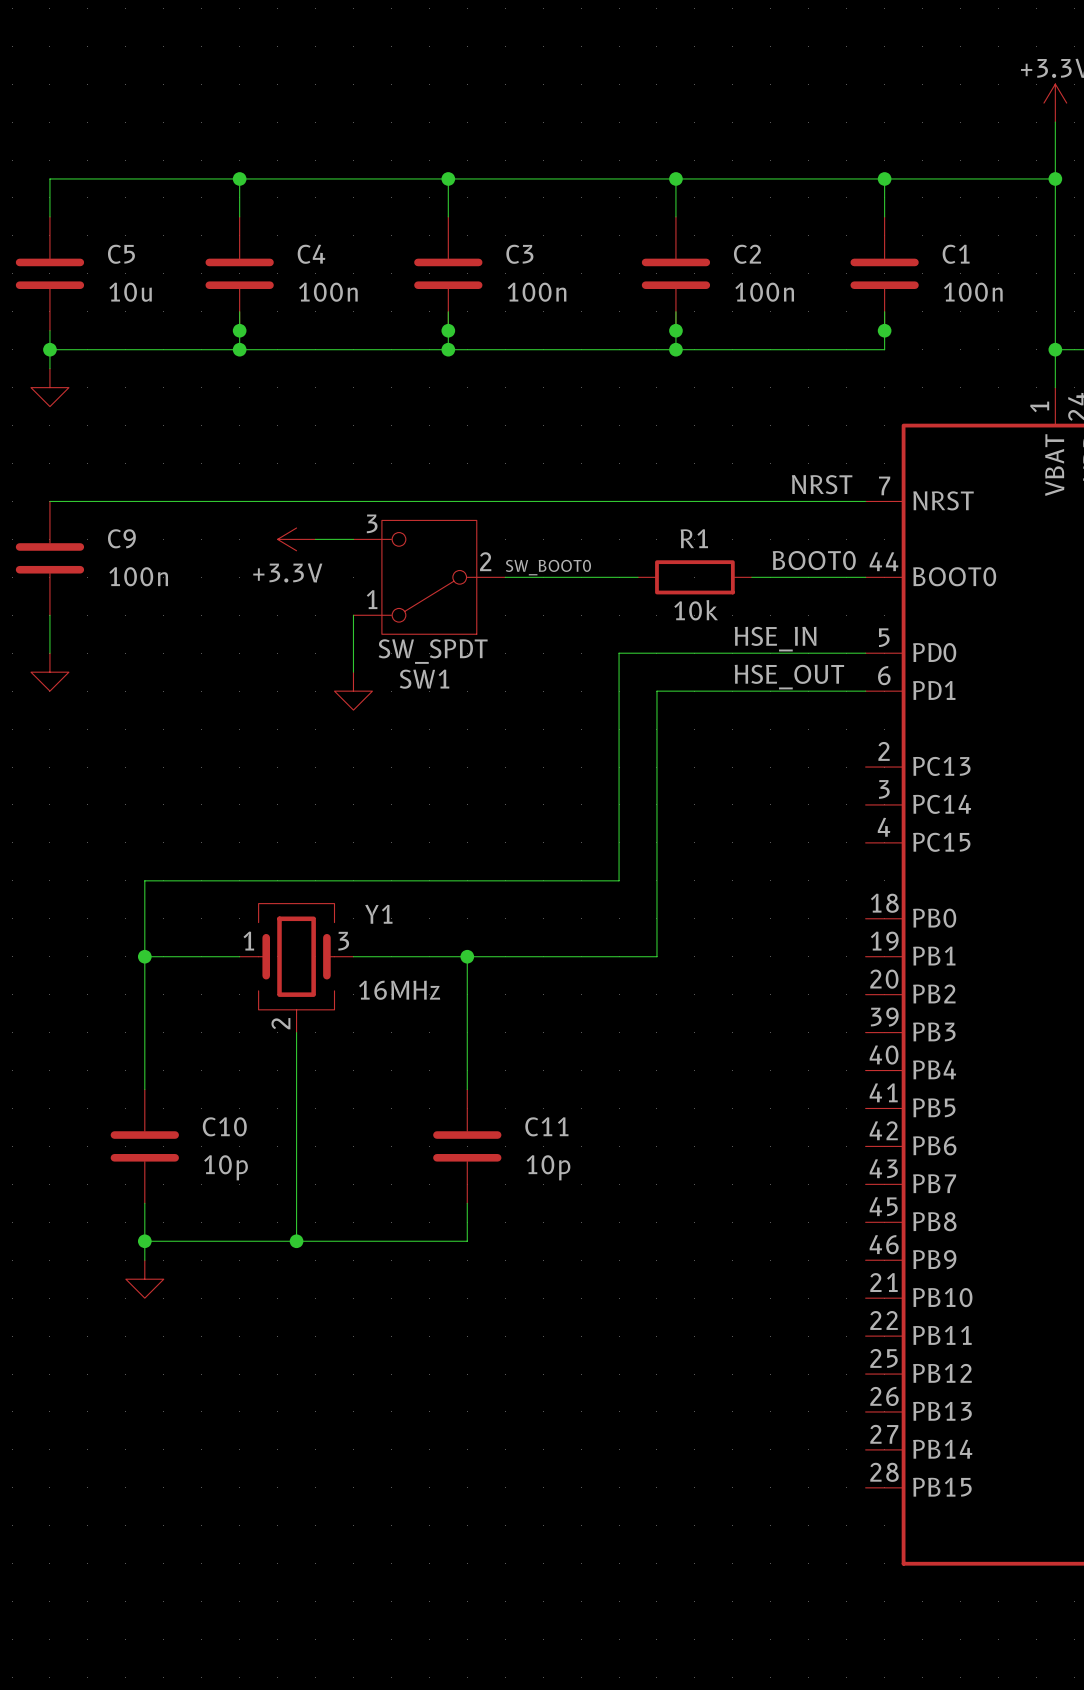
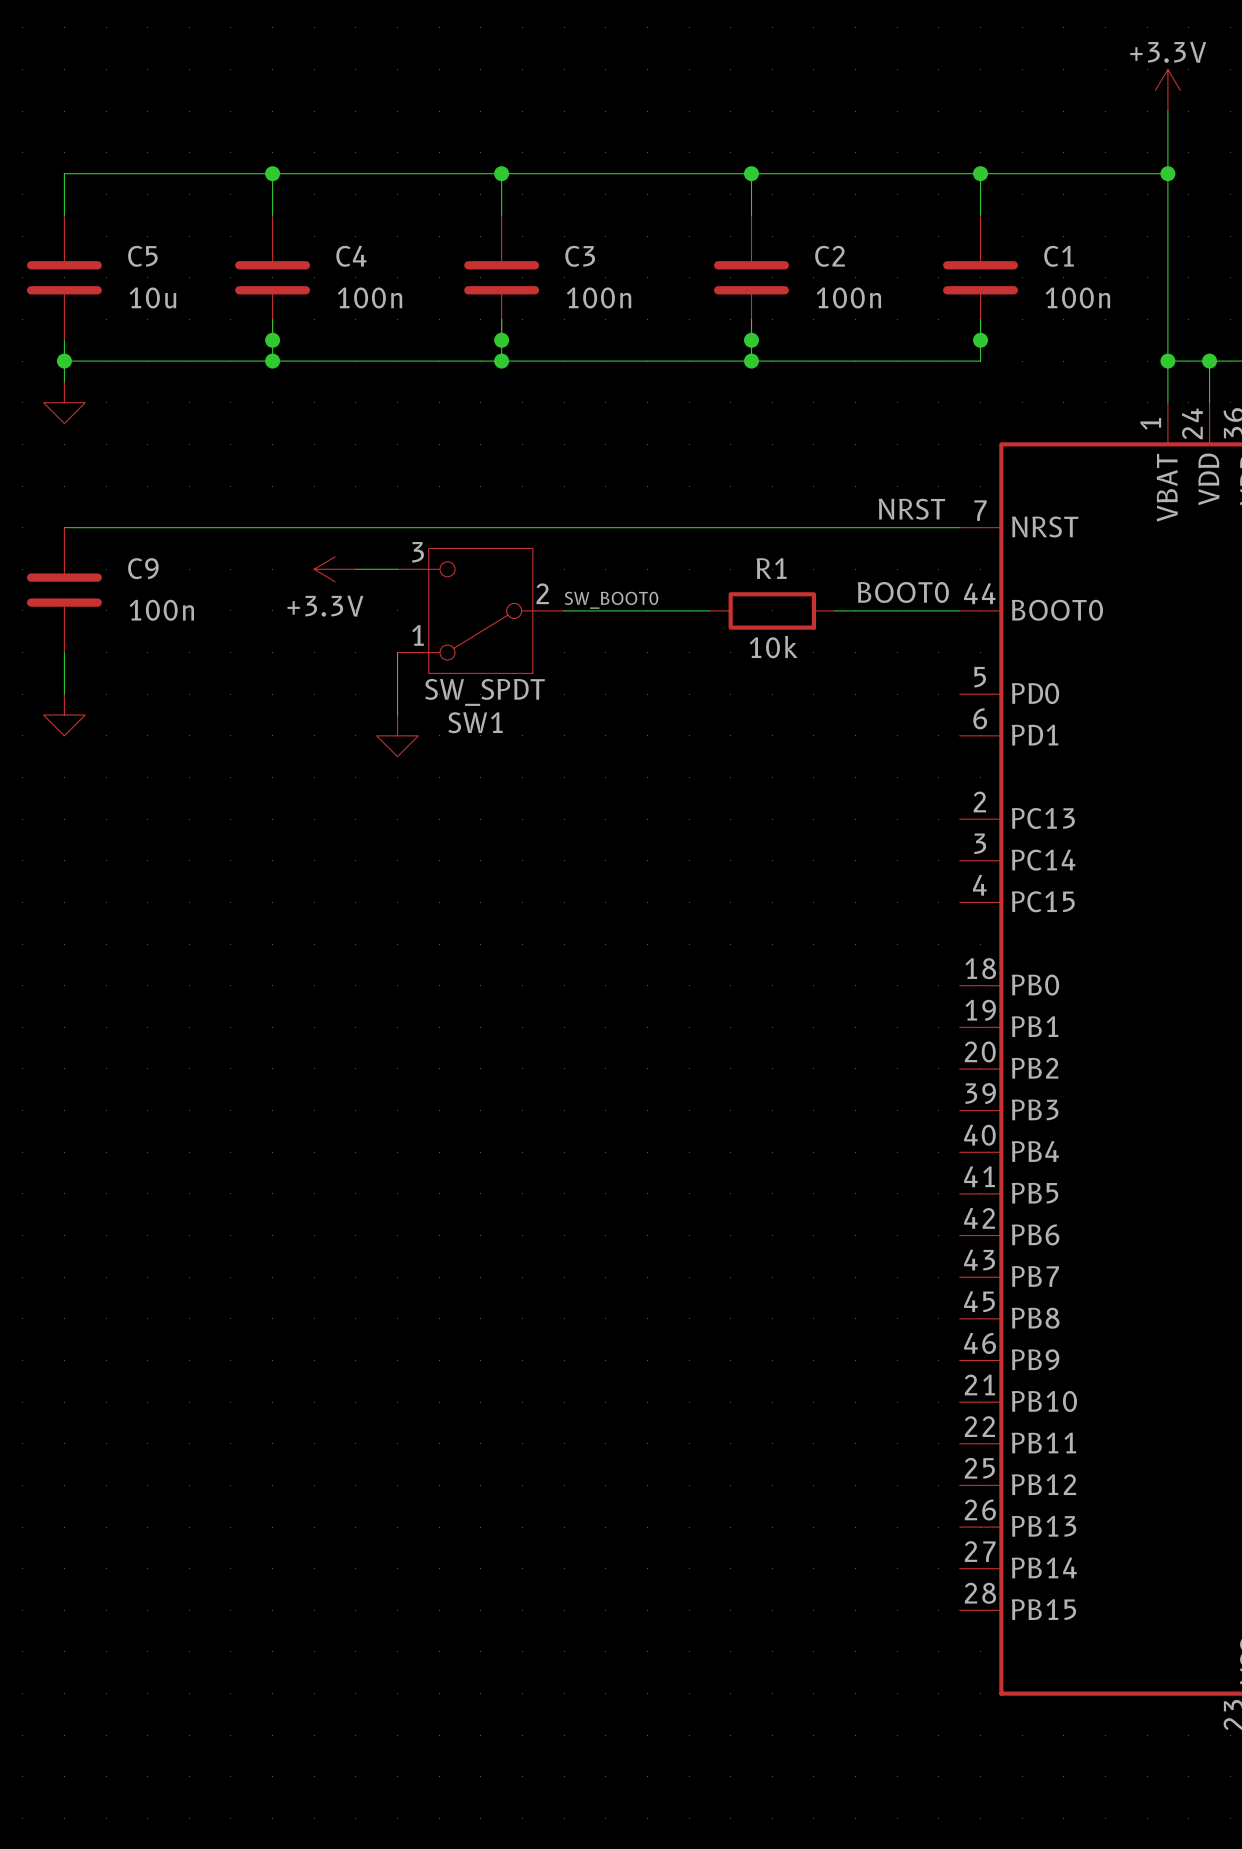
label: HSE_IN (775, 639) -> none
wire: (865, 653) (619, 653) (619, 880) (144, 880) (144, 1089) -> none
label: HSE_OUT (789, 677) -> none
wire: (865, 691) (656, 691) (656, 956) (353, 956) -> none
wire: (144, 956) (239, 956) -> none
junction: (144, 956) -> none
wire: (467, 956) (467, 1089) -> none
junction: (467, 956) -> none
Y1: 16MHz (296, 968) -> none
wire: (296, 1032) (296, 1241) -> none
C10: 10p (144, 1146) -> none
C11: 10p (467, 1146) -> none
wire: (144, 1203) (144, 1260) -> none
wire: (467, 1203) (467, 1241) (144, 1241) -> none
junction: (144, 1241) -> none
junction: (296, 1241) -> none
power symbol: (144, 1279) -> none

